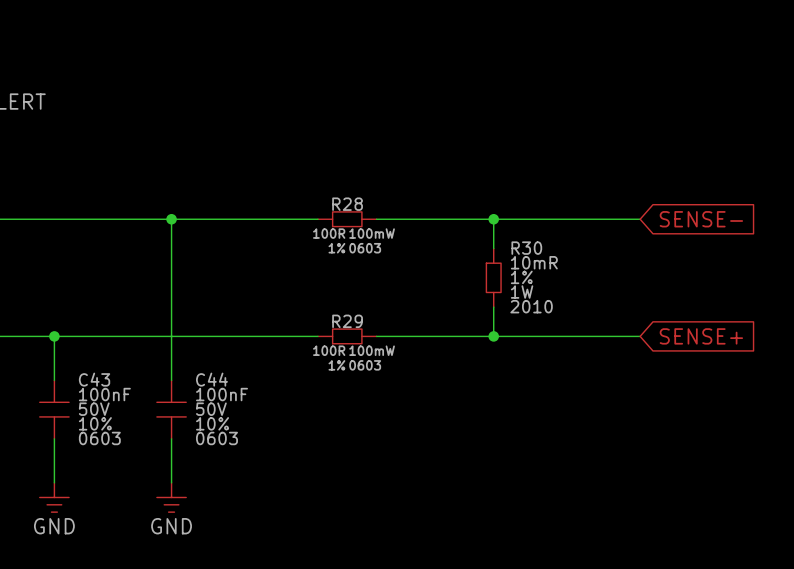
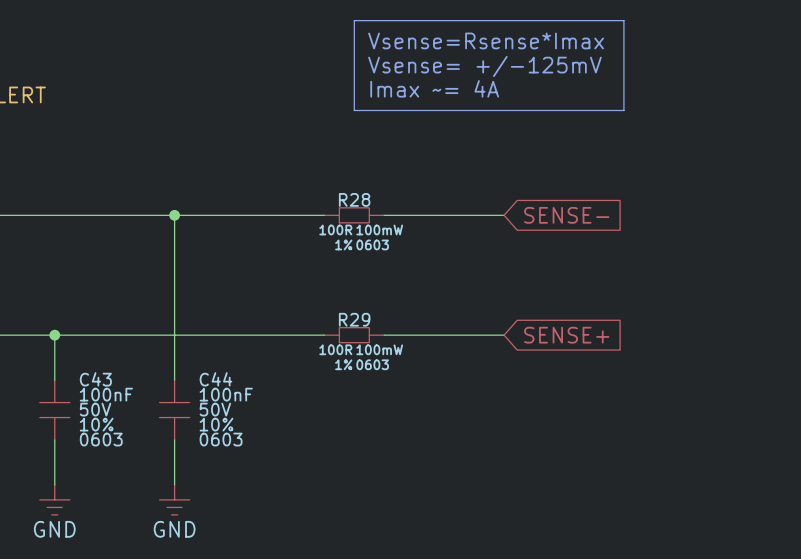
line: none -> (354, 20) (623, 20) (623, 110) (354, 110) (354, 20)
text: none -> Vsense=Rsense*Imax (486, 40)
text: none -> Vsense= +/-125mV (484, 66)
text: none -> Imax ~= 4A (434, 88)
junction: (493, 219) -> none
wire: (640, 219) (493, 219) (493, 248) -> none
global label position: SENSE- (701, 219) -> SENSE- (566, 215)
R30: 10mR (493, 277) -> none
wire: (493, 307) (493, 336) (640, 336) -> none
junction: (493, 336) -> none
global label position: SENSE+ (701, 336) -> SENSE+ (566, 335)

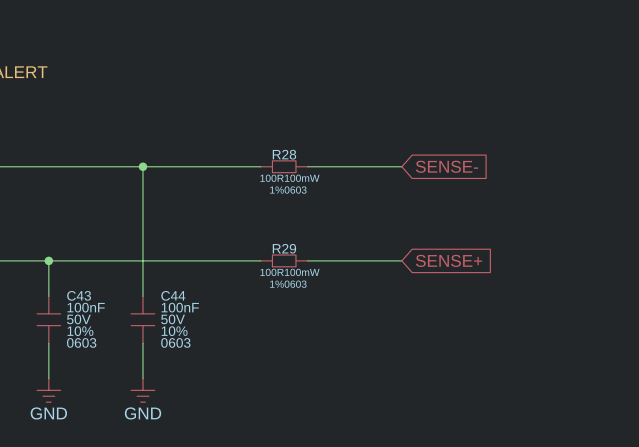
line: (354, 20) (623, 20) (623, 110) (354, 110) (354, 20) -> none
text: Vsense=Rsense*Imax (486, 40) -> none
text: Vsense= +/-125mV (484, 66) -> none
text: Imax ~= 4A (434, 88) -> none

